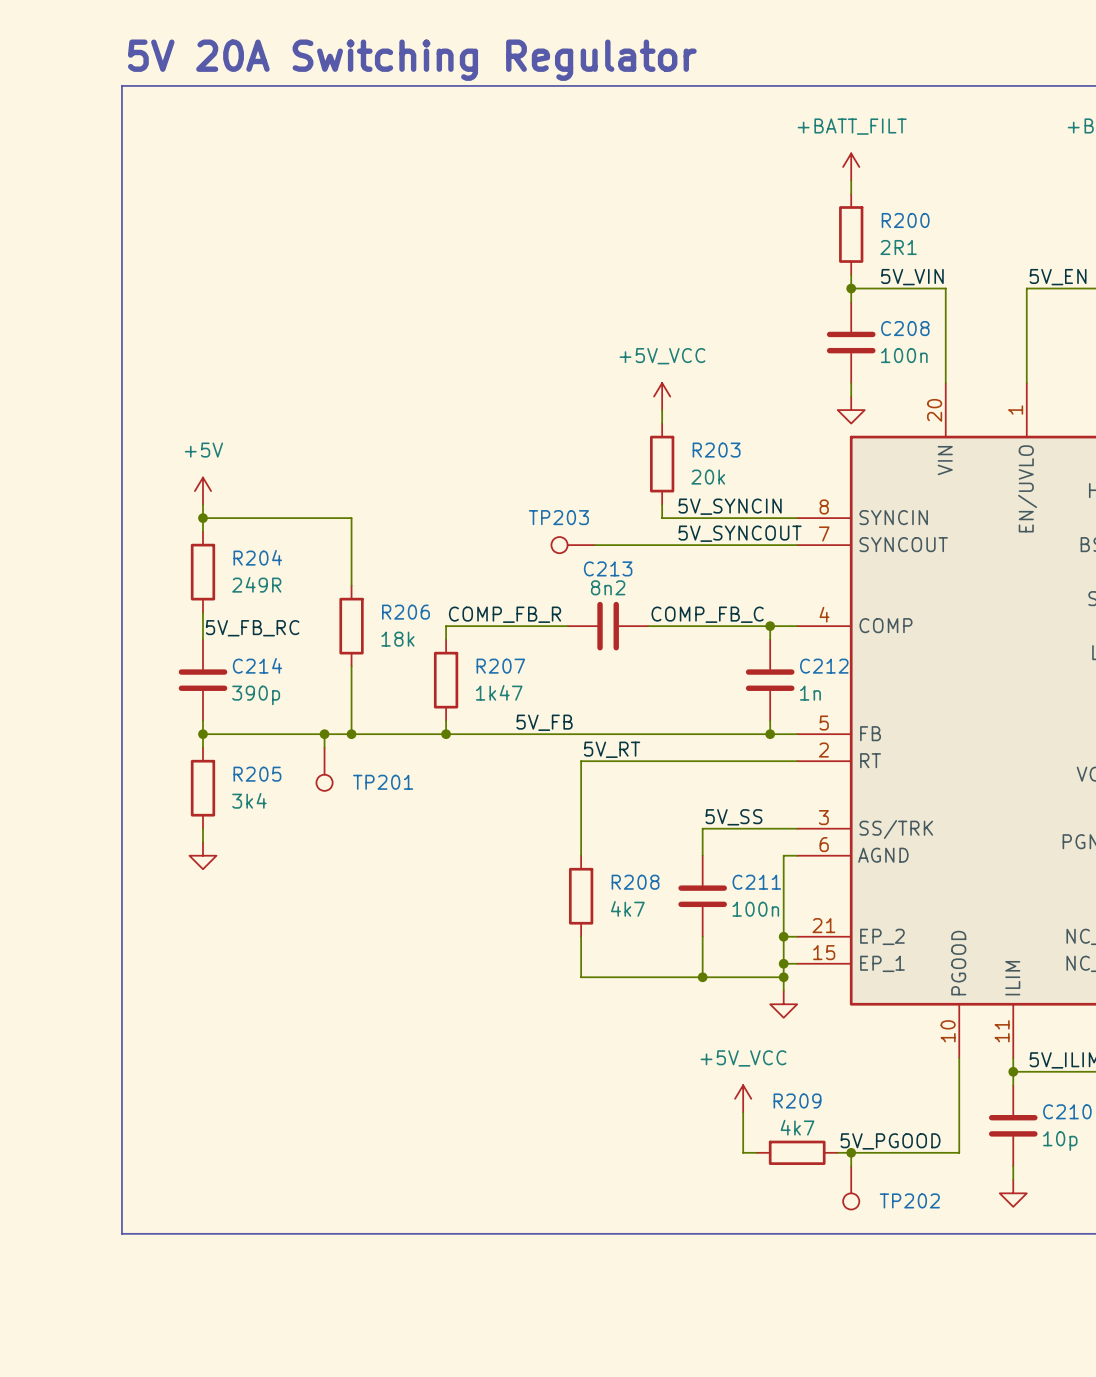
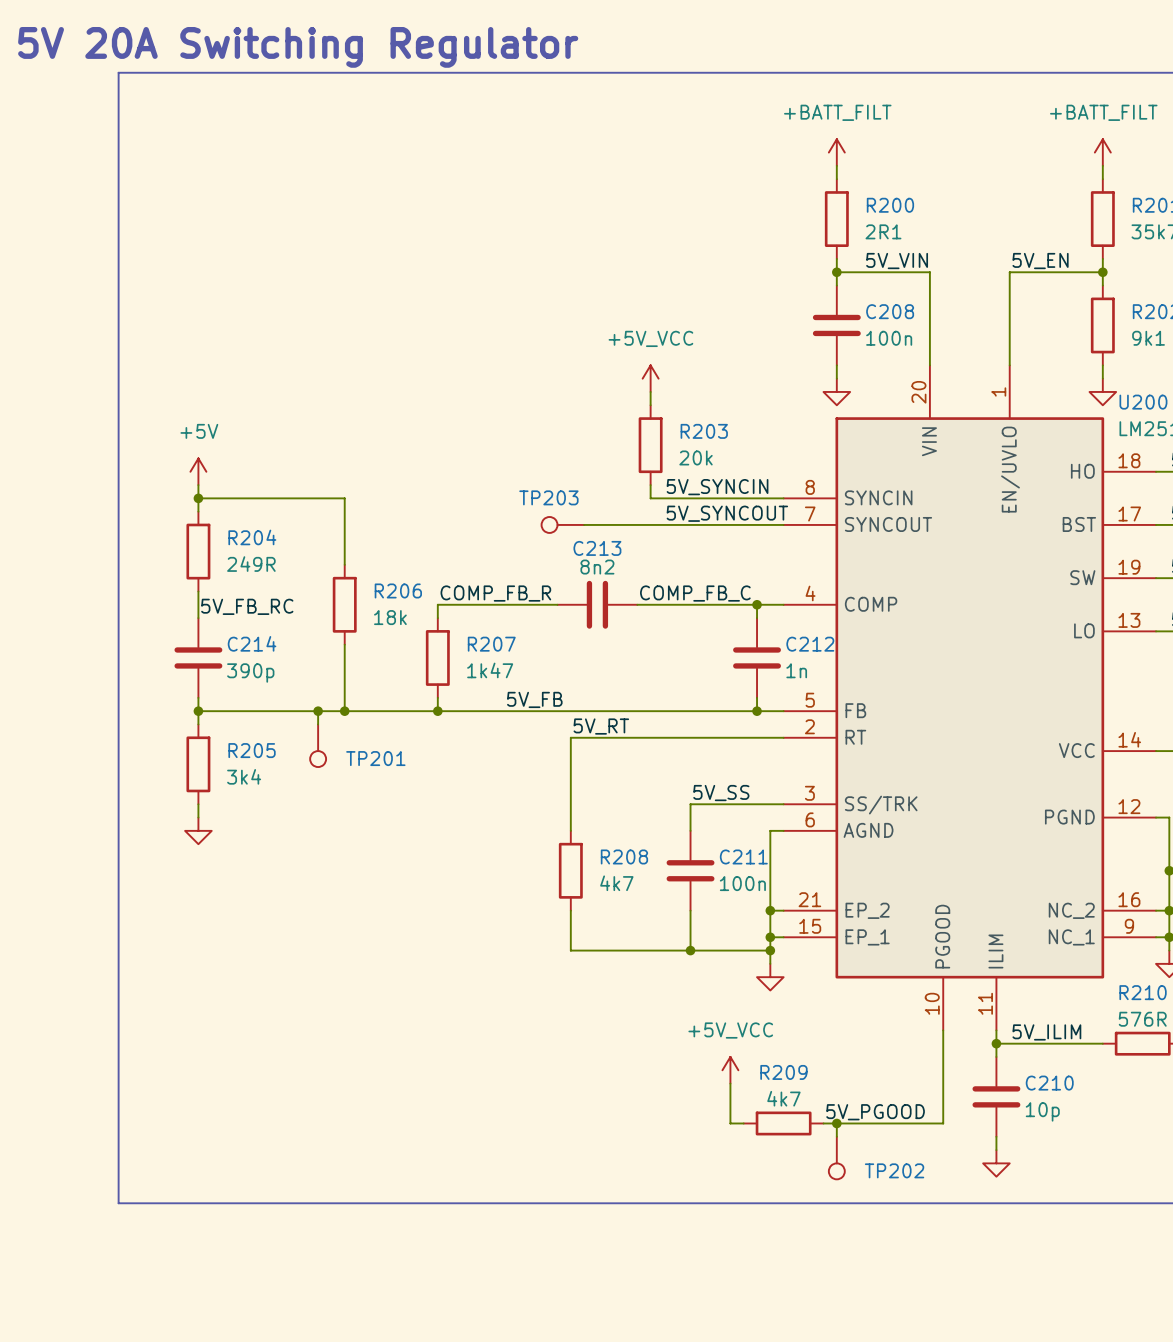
text position: 5V 20A Switching Regulator (412, 60) -> 5V 20A Switching Regulator (298, 47)

